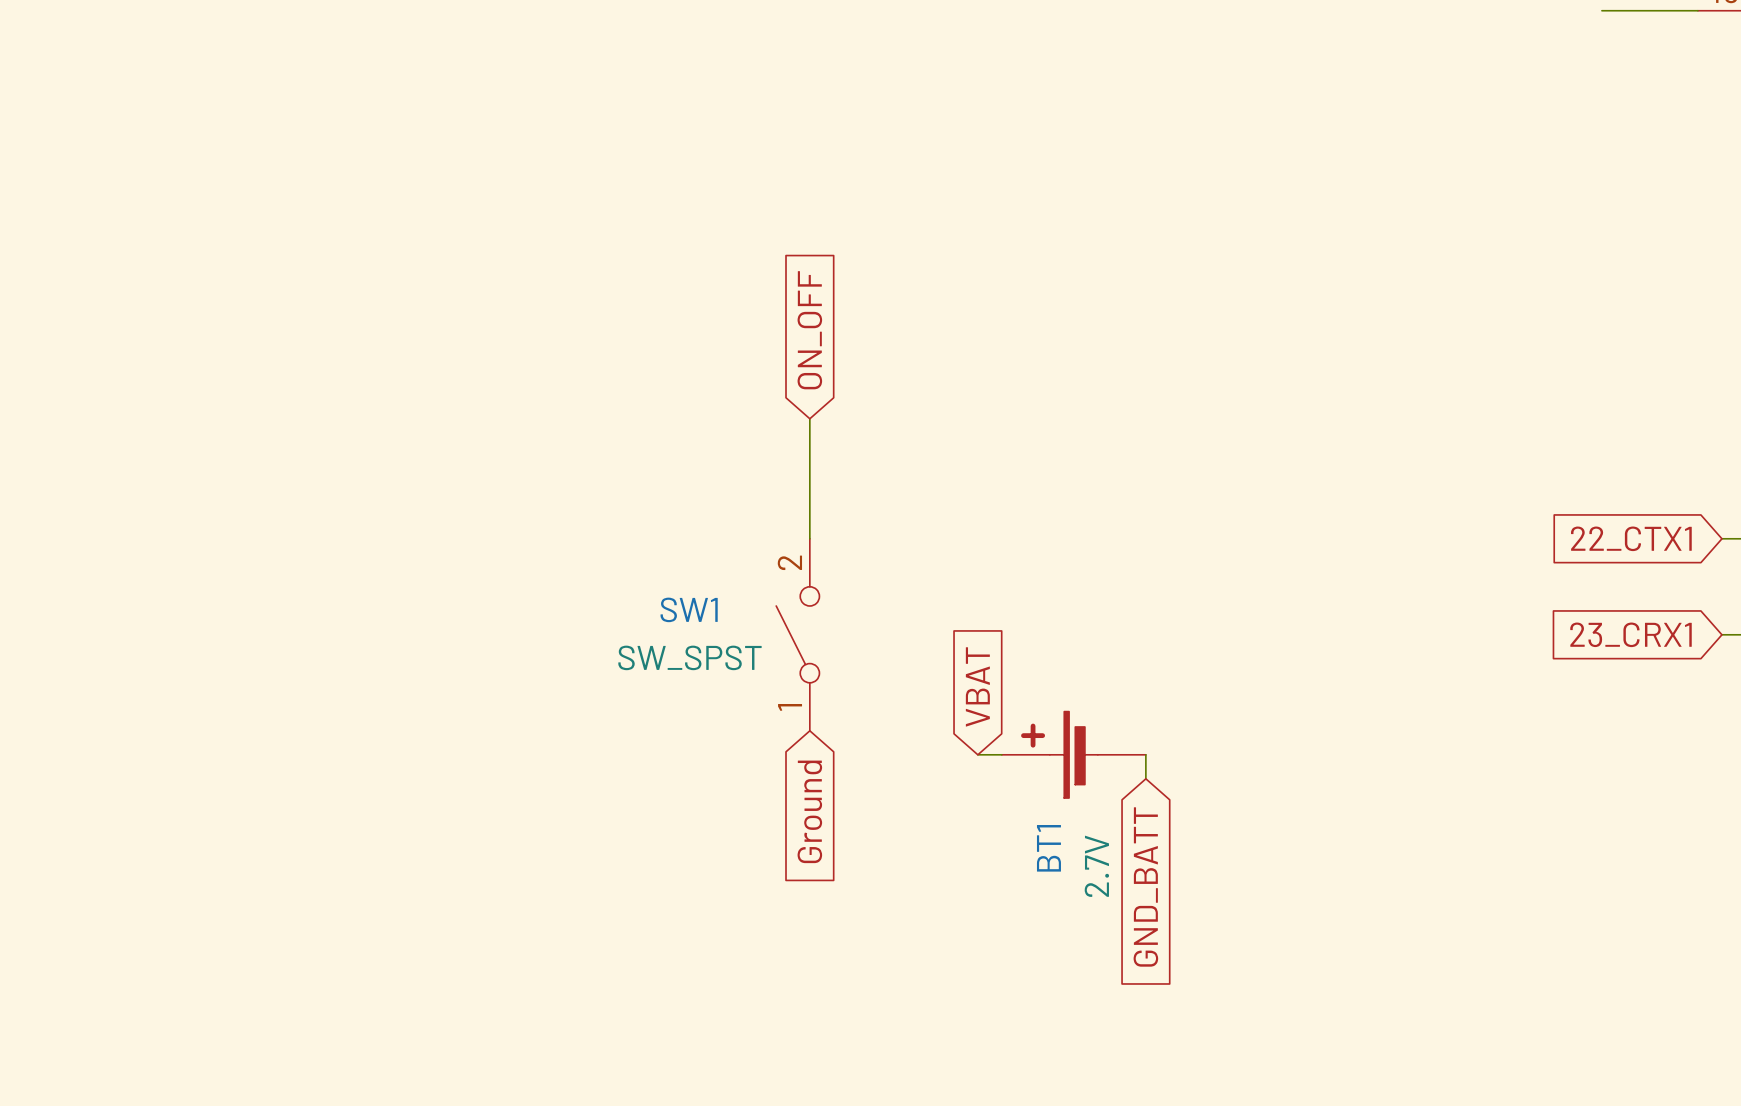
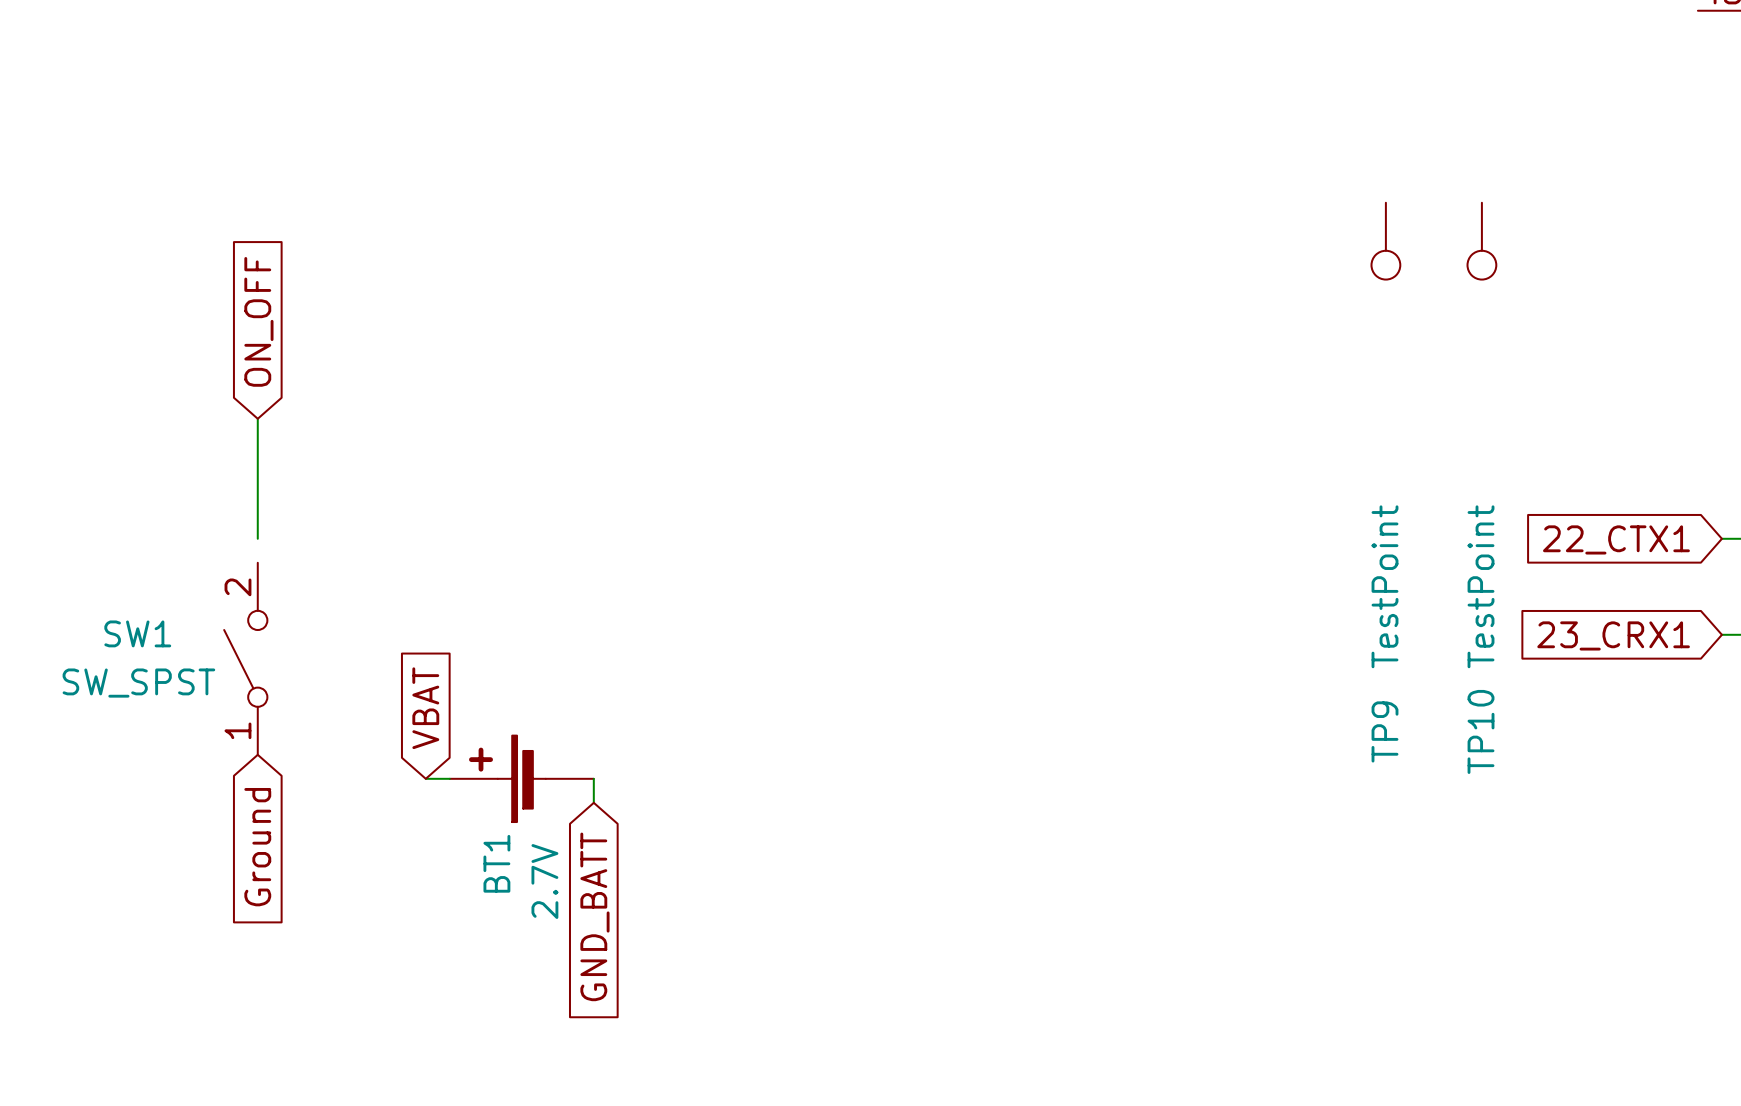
wire: (1601, 10) (1697, 10) -> none
TP9: none -> TestPoint (1385, 241)
TP10: none -> TestPoint (1481, 241)
global label: none -> ON_OFF (258, 321)
global label: ON_OFF (809, 330) -> none
wire: none -> (257, 418) (257, 538)
wire: (809, 418) (809, 538) -> none
SW1 position: (797, 634) -> (245, 658)
global label: VBAT (977, 686) -> none
global label: none -> VBAT (425, 708)
wire: (977, 754) (1001, 754) -> none
BT1 position: (1073, 754) -> (521, 778)
wire: (1145, 754) (1145, 778) -> none
wire: none -> (425, 778) (449, 778)
wire: none -> (593, 778) (593, 802)
global label: Ground (809, 811) -> none
global label: none -> Ground (257, 847)
global label: GND_BATT (1145, 886) -> none
global label: none -> GND_BATT (594, 916)

